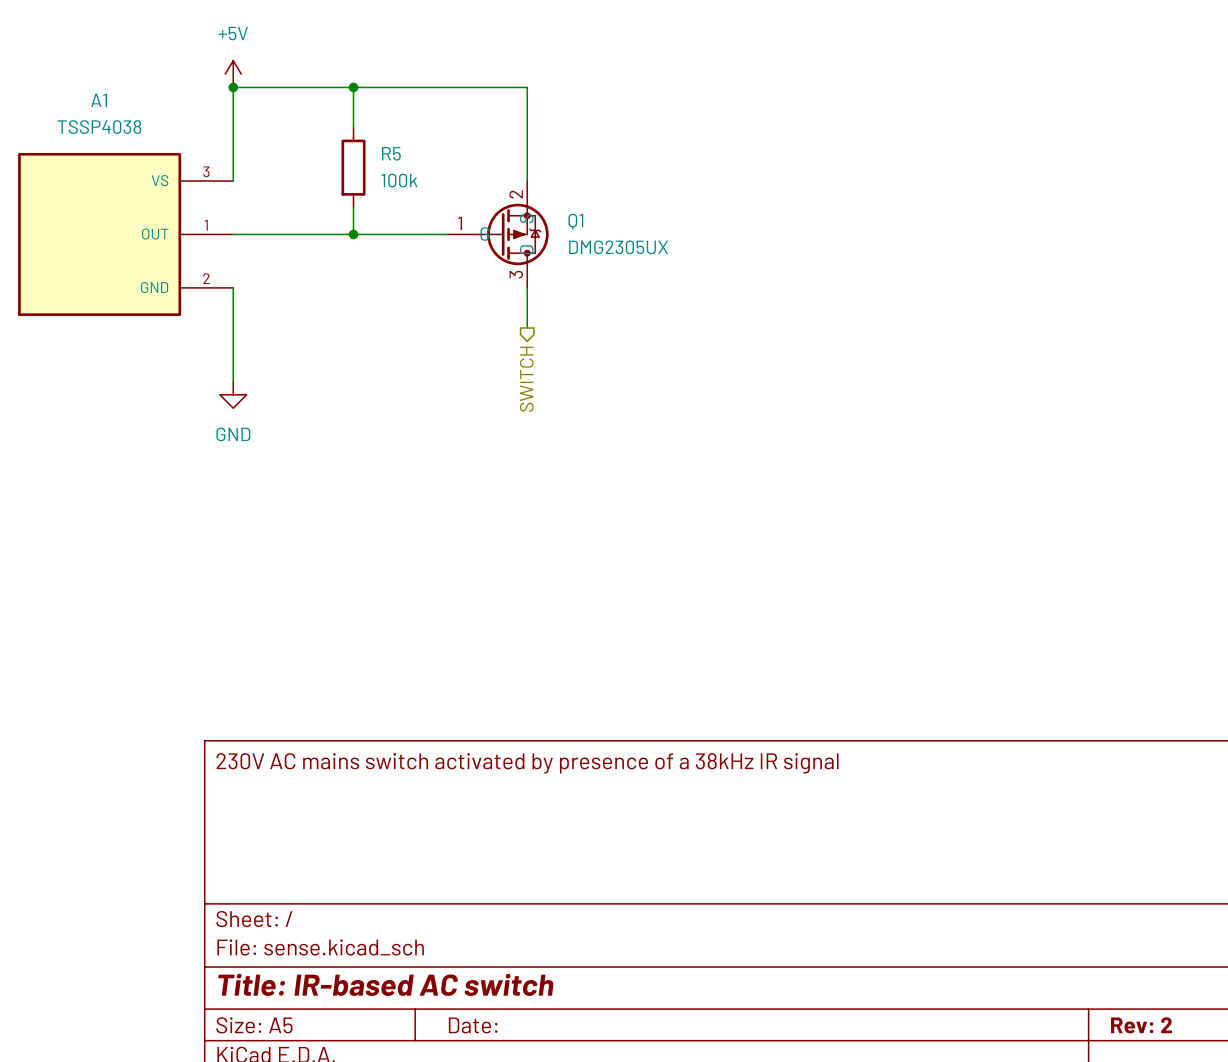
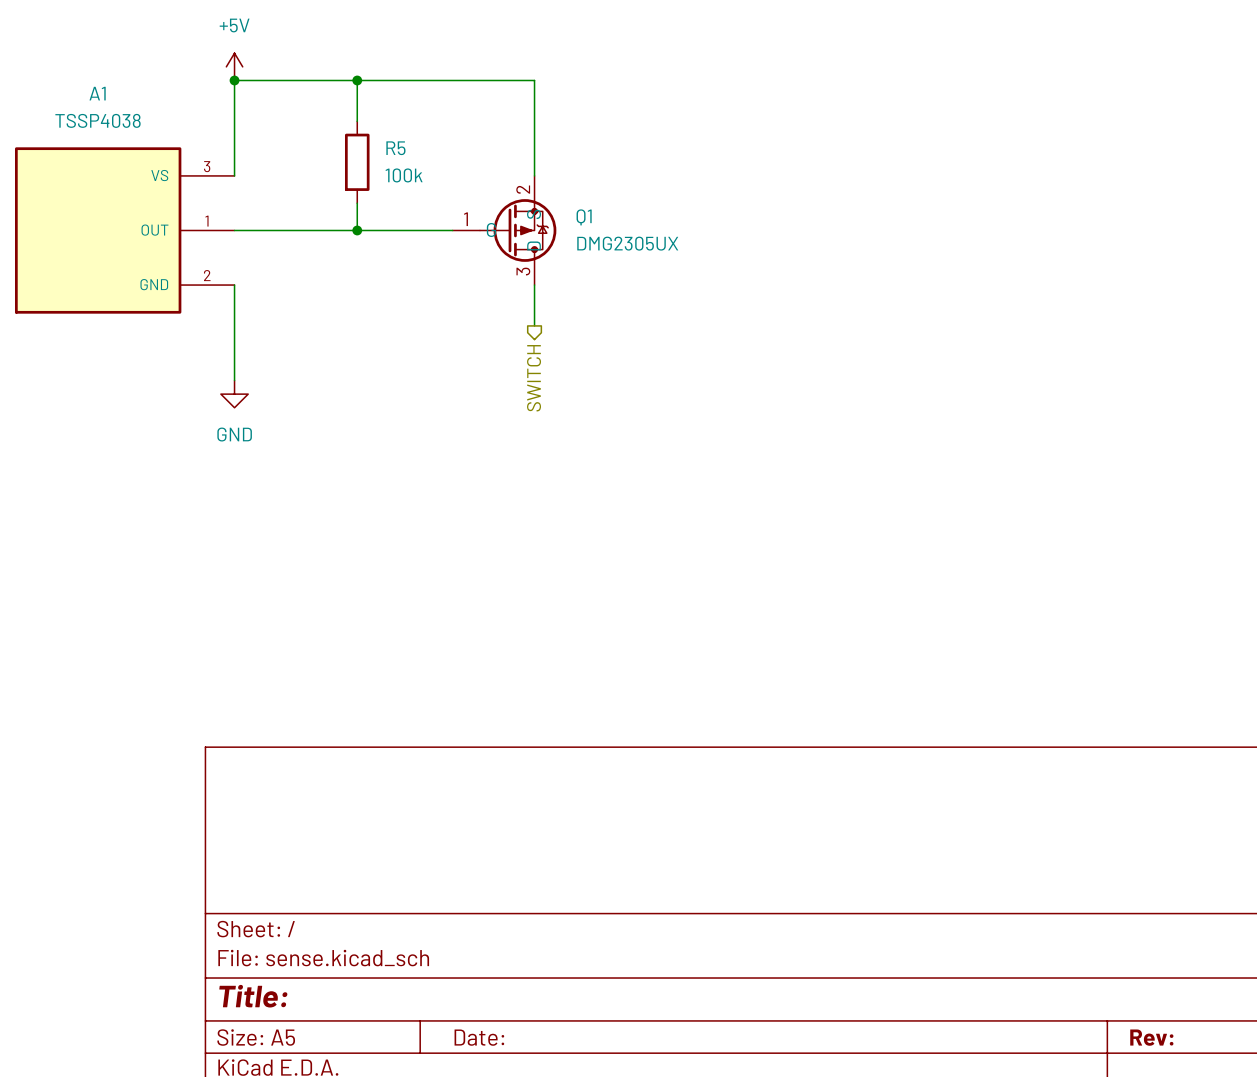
title block: 230V AC mains switch activated by presence of a 38kHz IR signal (527, 763) -> none
title block: Title: IR-based AC switch (385, 984) -> Title: (253, 996)
title block: Rev: 2 (1141, 1025) -> Rev: (1151, 1037)

